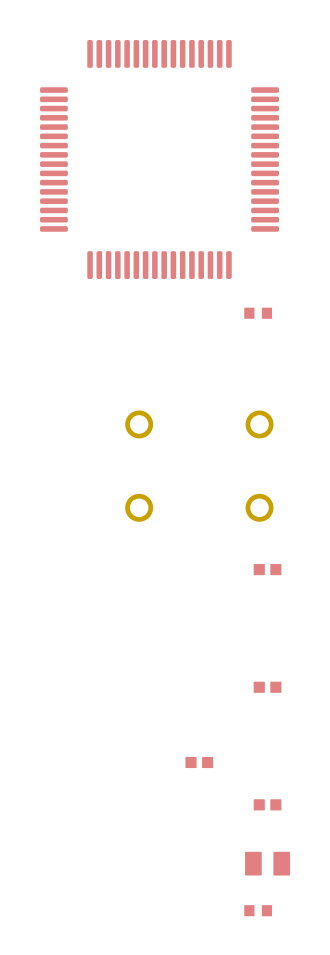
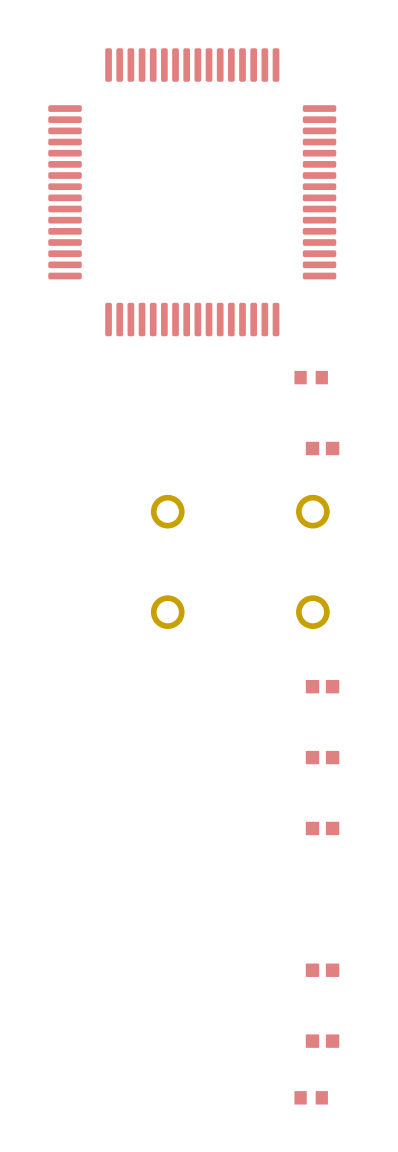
part: none -> (322, 448)
part position: (199, 762) -> (322, 757)
part footprint: [245, 851, 291, 876] -> [305, 1034, 340, 1048]

